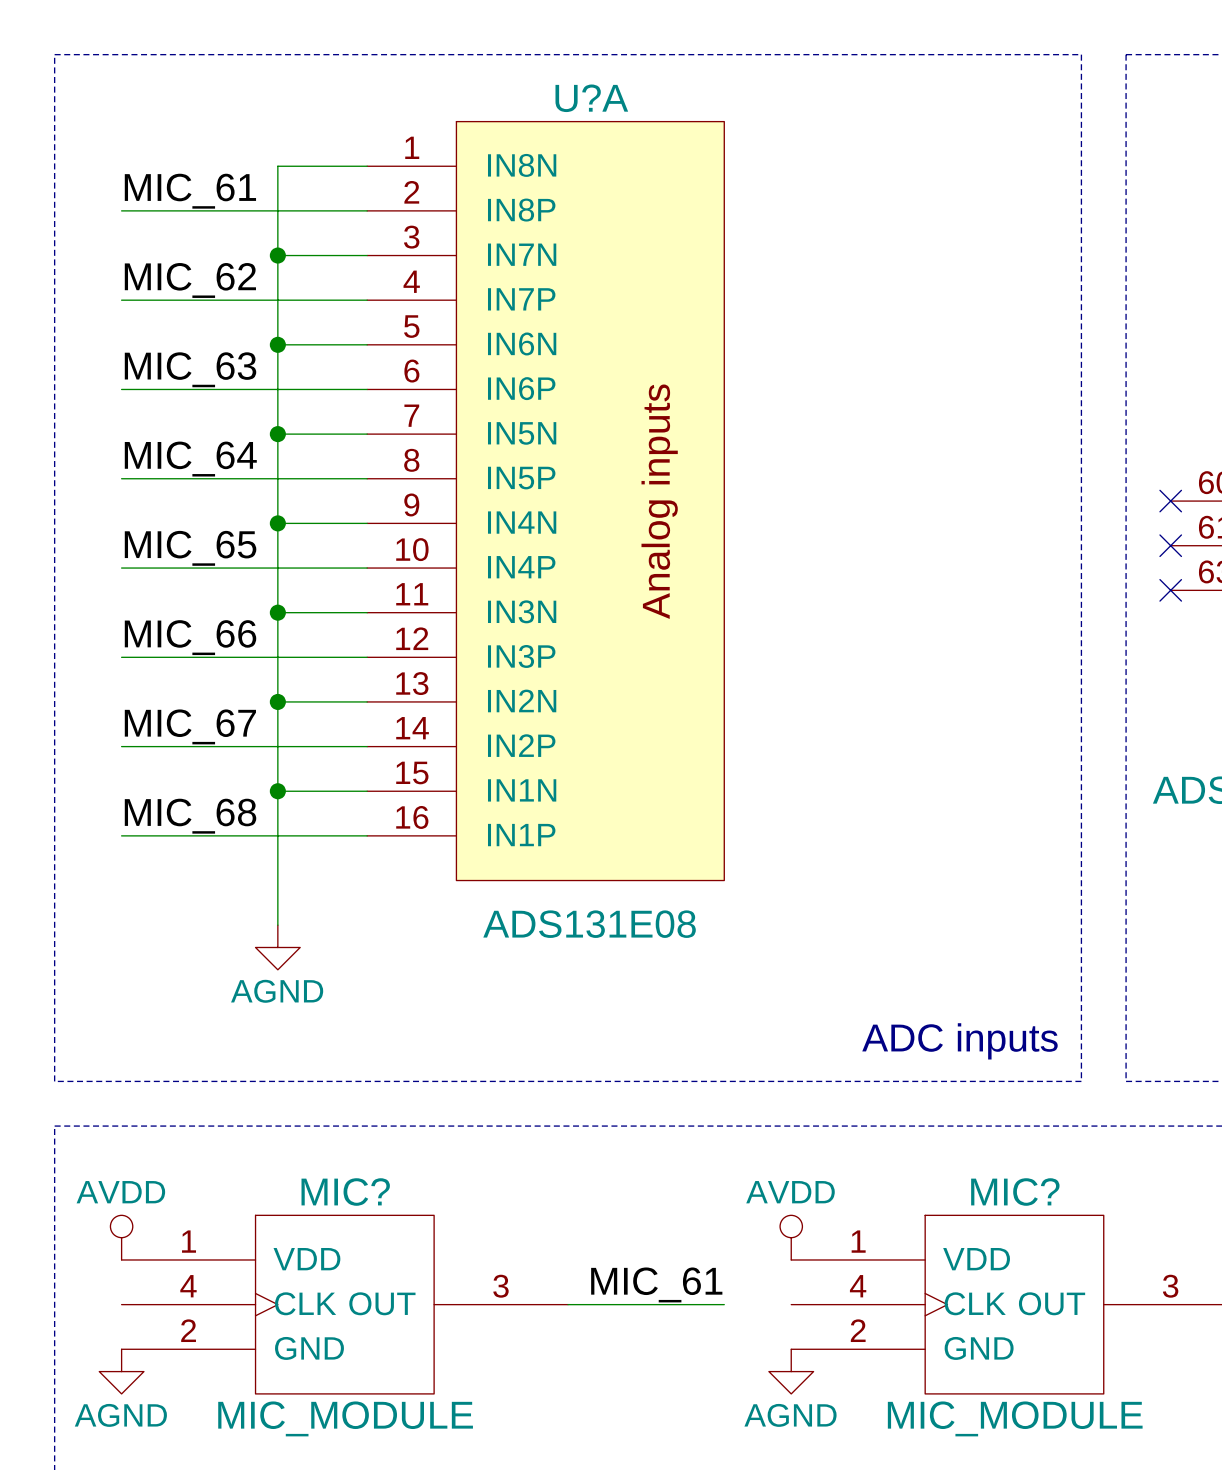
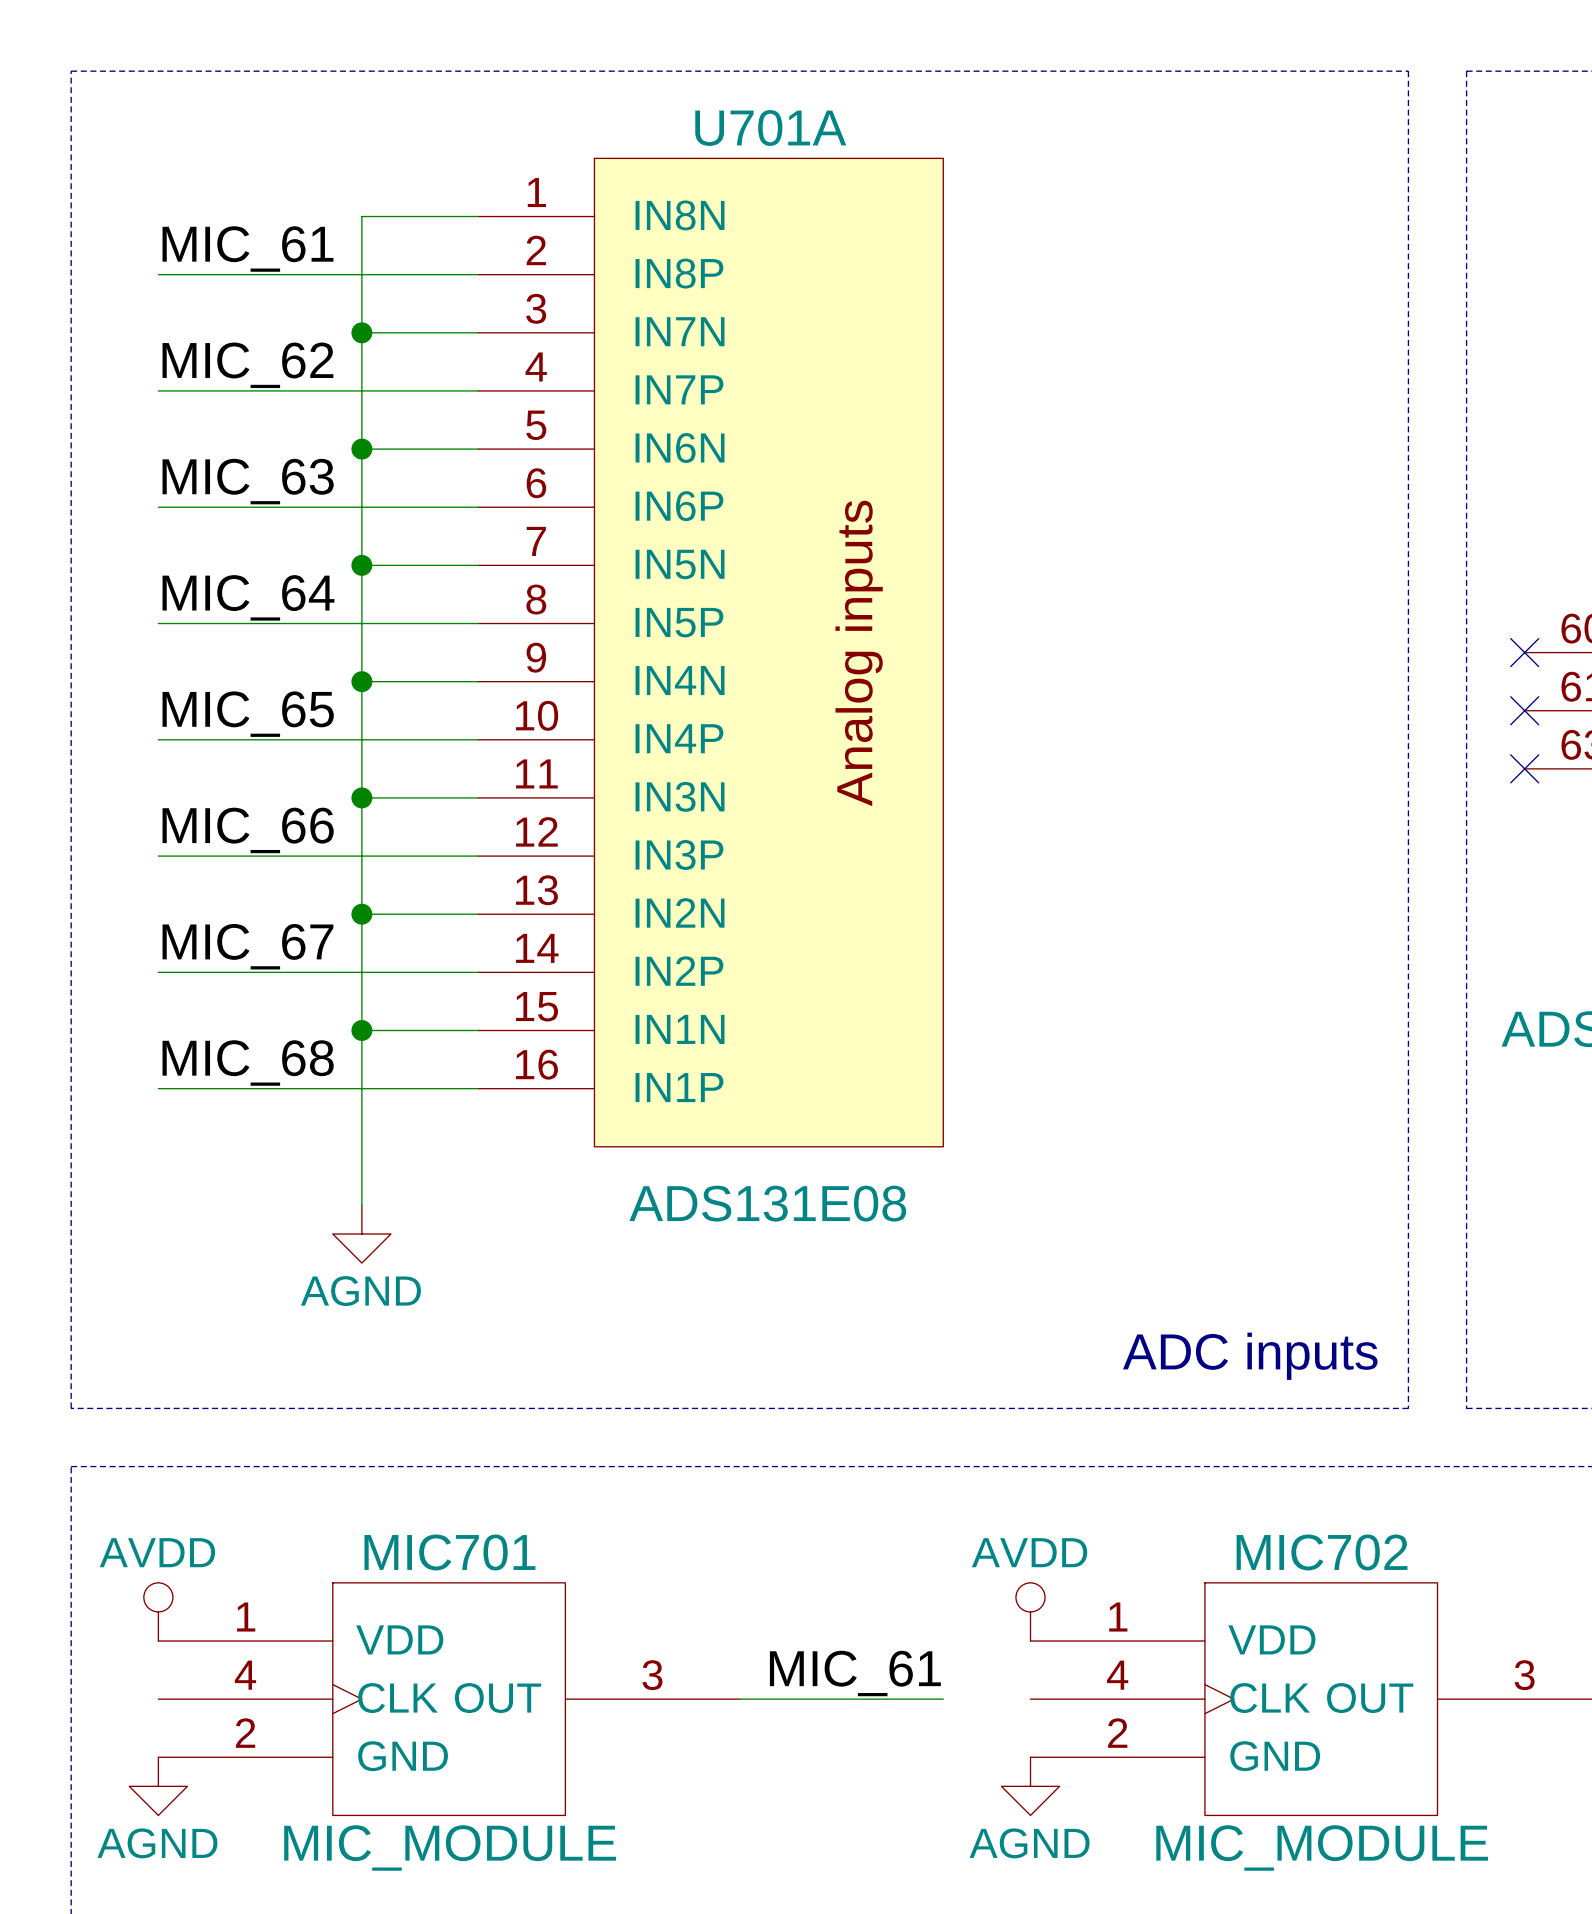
U?A name: U?A (591, 98) -> U701A (770, 127)
MIC? name: MIC? (345, 1192) -> MIC701 (449, 1552)
MIC? name: MIC? (1015, 1192) -> MIC702 (1322, 1552)

